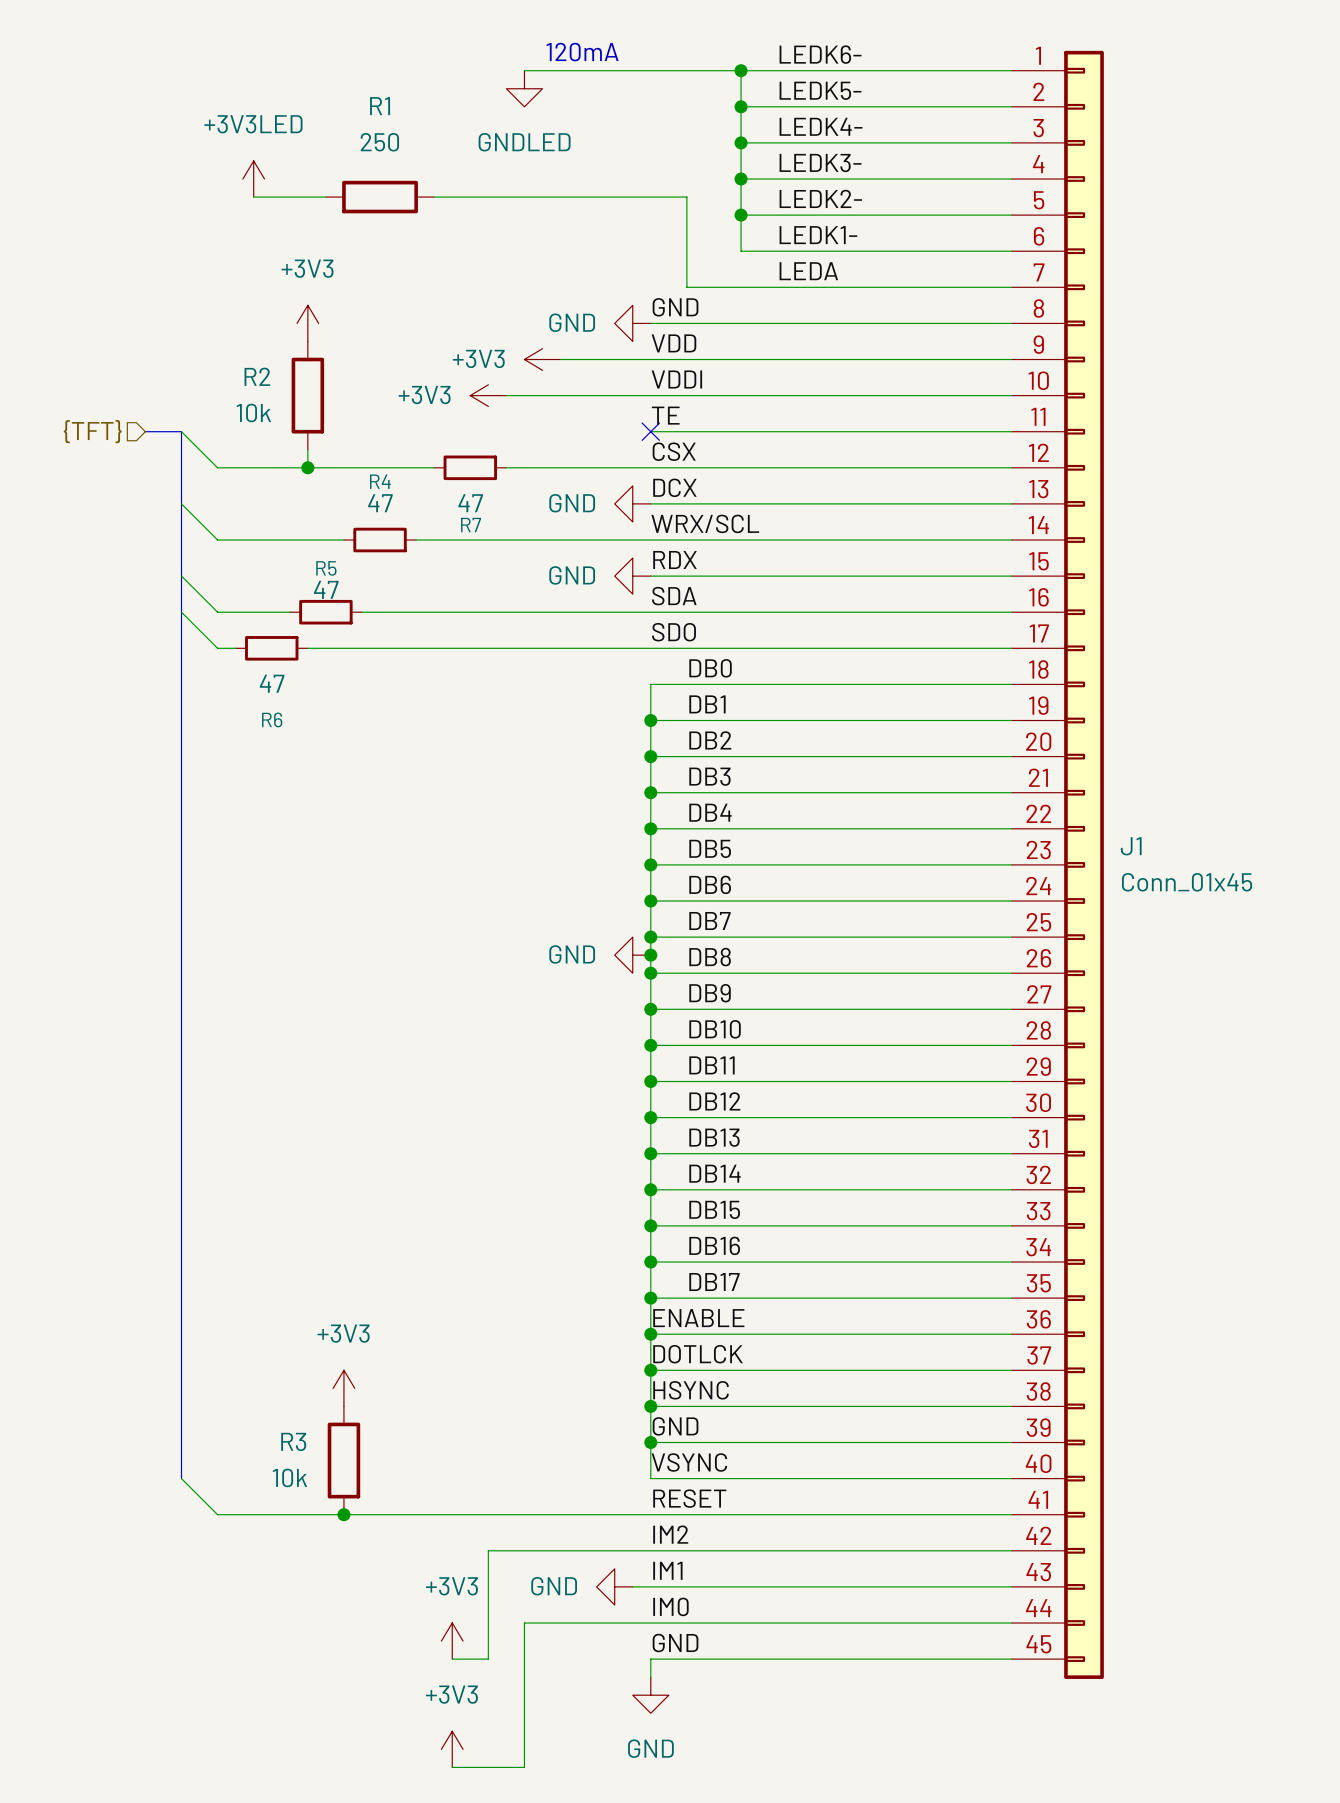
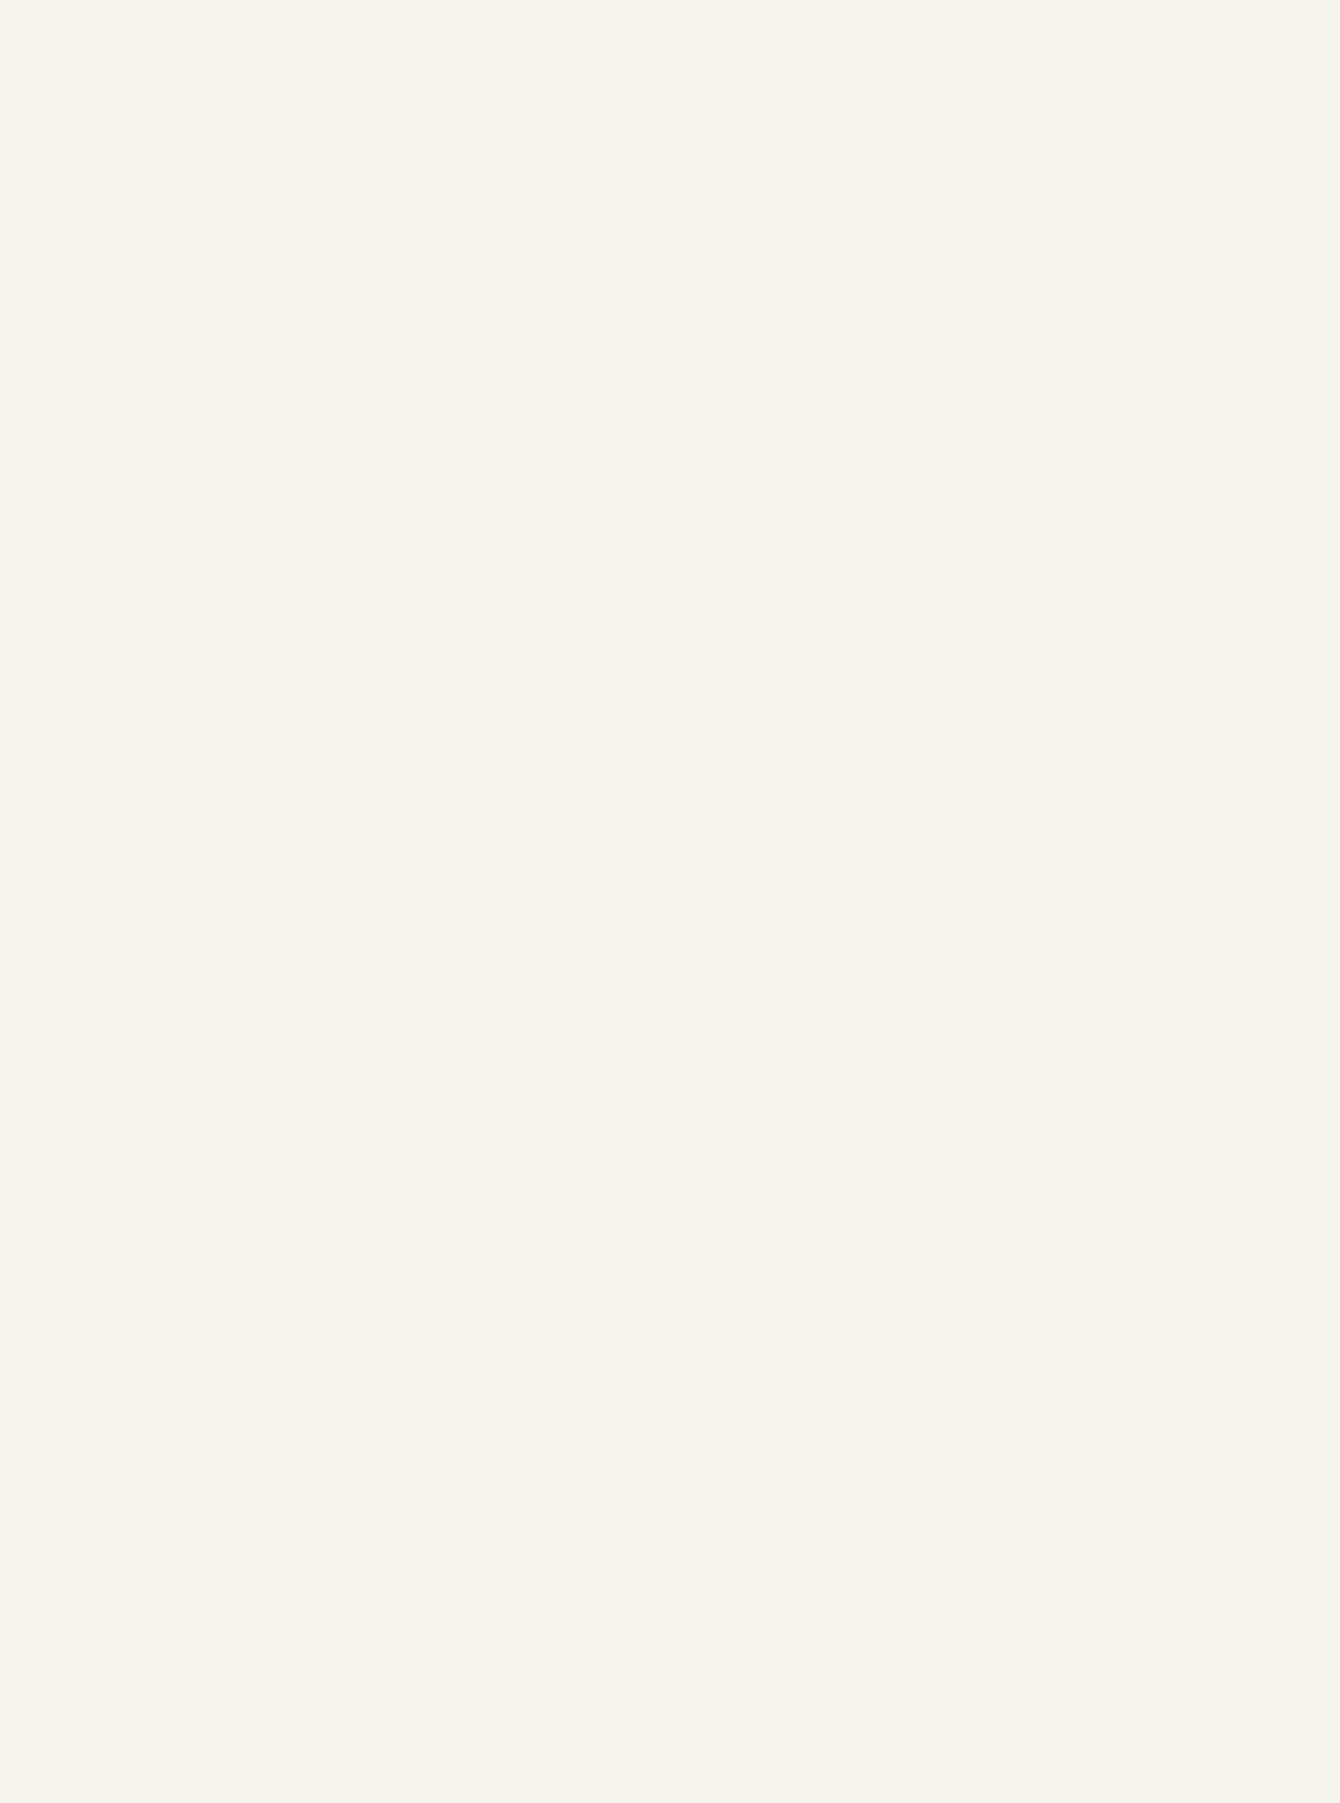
text: 120mA (582, 52) -> none
label: LEDK6- (820, 54) -> none
wire: (524, 70) (1011, 70) -> none
wire: (741, 70) (741, 251) (1011, 251) -> none
junction: (741, 70) -> none
power symbol: GNDLED (524, 88) -> none
label: LEDK5- (820, 90) -> none
wire: (741, 106) (1011, 106) -> none
junction: (741, 106) -> none
label: LEDK4- (821, 126) -> none
wire: (741, 142) (1011, 142) -> none
junction: (741, 142) -> none
label: LEDK3- (820, 163) -> none
power symbol: +3V3LED (253, 179) -> none
wire: (741, 179) (1011, 179) -> none
junction: (741, 179) -> none
wire: (253, 197) (325, 197) -> none
R1: 250 (380, 197) -> none
wire: (434, 197) (686, 197) (686, 287) (1011, 287) -> none
label: LEDK2- (820, 198) -> none
wire: (741, 215) (1011, 215) -> none
junction: (741, 215) -> none
label: LEDK1- (818, 235) -> none
label: LEDA (808, 271) -> none
label: GND (675, 307) -> none
power symbol: +3V3 (307, 323) -> none
power symbol: GND (632, 323) -> none
wire: (650, 323) (1011, 323) -> none
label: VDD (673, 343) -> none
power symbol: +3V3 (542, 359) -> none
wire: (560, 359) (1011, 359) -> none
label: VDDI (676, 379) -> none
R2: 10k (307, 395) -> none
power symbol: +3V3 (488, 395) -> none
wire: (506, 395) (1011, 395) -> none
label: TE (665, 415) -> none
hierarchical label: {TFT} (92, 431) -> none
bus: (145, 431) (181, 431) (181, 1478) -> none
wire: (181, 431) (217, 467) (434, 467) -> none
wire: (650, 431) (1011, 431) -> none
no-connect mark: (650, 431) -> none
wire: (307, 449) (307, 467) -> none
label: CSX (674, 451) -> none
junction: (307, 467) -> none
R7: 47 (470, 467) -> none
wire: (506, 467) (1011, 467) -> none
label: DCX (674, 487) -> none
wire: (181, 503) (217, 540) (343, 540) -> none
power symbol: GND (632, 503) -> none
wire: (650, 503) (1011, 503) -> none
label: WRX/SCL (705, 523) -> none
R4: 47 (380, 540) -> none
wire: (416, 540) (1011, 540) -> none
label: RDX (674, 560) -> none
wire: (181, 576) (217, 612) (289, 612) -> none
power symbol: GND (632, 576) -> none
wire: (650, 576) (1011, 576) -> none
label: SDA (674, 596) -> none
wire: (181, 612) (217, 648) (235, 648) -> none
R5: 47 (325, 612) -> none
wire: (362, 612) (1011, 612) -> none
label: SDO (674, 632) -> none
R6: 47 (271, 648) -> none
wire: (307, 648) (1011, 648) -> none
label: DB0 (710, 668) -> none
wire: (1011, 684) (650, 684) (650, 1478) (1011, 1478) -> none
label: DB1 (707, 704) -> none
wire: (650, 720) (1011, 720) -> none
junction: (650, 720) -> none
label: DB2 (710, 740) -> none
wire: (650, 756) (1011, 756) -> none
junction: (650, 756) -> none
label: DB3 (709, 776) -> none
wire: (650, 792) (1011, 792) -> none
junction: (650, 792) -> none
label: DB4 (710, 812) -> none
wire: (650, 828) (1011, 828) -> none
junction: (650, 828) -> none
label: DB5 (710, 848) -> none
wire: (650, 864) (1011, 864) -> none
junction: (650, 864) -> none
J1: Conn_01x45 (1057, 864) -> none
label: DB6 (710, 884) -> none
wire: (650, 901) (1011, 901) -> none
junction: (650, 901) -> none
label: DB7 (709, 921) -> none
wire: (650, 937) (1011, 937) -> none
junction: (650, 937) -> none
power symbol: GND (632, 955) -> none
junction: (650, 955) -> none
label: DB8 (710, 957) -> none
wire: (650, 973) (1011, 973) -> none
junction: (650, 973) -> none
label: DB9 (710, 993) -> none
wire: (650, 1009) (1011, 1009) -> none
junction: (650, 1009) -> none
label: DB10 (715, 1029) -> none
wire: (650, 1045) (1011, 1045) -> none
junction: (650, 1045) -> none
label: DB11 (711, 1065) -> none
wire: (650, 1081) (1011, 1081) -> none
junction: (650, 1081) -> none
label: DB12 (714, 1101) -> none
wire: (650, 1117) (1011, 1117) -> none
junction: (650, 1117) -> none
label: DB13 (714, 1137) -> none
wire: (650, 1153) (1011, 1153) -> none
junction: (650, 1153) -> none
label: DB14 (715, 1173) -> none
wire: (650, 1189) (1011, 1189) -> none
junction: (650, 1189) -> none
label: DB15 (714, 1209) -> none
wire: (650, 1225) (1011, 1225) -> none
junction: (650, 1225) -> none
label: DB16 (714, 1245) -> none
wire: (650, 1262) (1011, 1262) -> none
junction: (650, 1262) -> none
label: DB17 (714, 1282) -> none
wire: (650, 1298) (1011, 1298) -> none
junction: (650, 1298) -> none
label: ENABLE (698, 1318) -> none
wire: (650, 1334) (1011, 1334) -> none
junction: (650, 1334) -> none
label: DOTLCK (698, 1354) -> none
wire: (650, 1370) (1011, 1370) -> none
junction: (650, 1370) -> none
power symbol: +3V3 (343, 1388) -> none
label: HSYNC (690, 1390) -> none
wire: (650, 1406) (1011, 1406) -> none
junction: (650, 1406) -> none
label: GND (675, 1426) -> none
wire: (650, 1442) (1011, 1442) -> none
junction: (650, 1442) -> none
R3: 10k (343, 1460) -> none
label: VSYNC (689, 1462) -> none
wire: (181, 1478) (217, 1514) (1011, 1514) -> none
label: RESET (689, 1498) -> none
junction: (343, 1514) -> none
label: IM2 (670, 1534) -> none
wire: (1011, 1550) (488, 1550) (488, 1659) (452, 1659) -> none
label: IM1 (667, 1570) -> none
power symbol: GND (614, 1586) -> none
wire: (632, 1586) (1011, 1586) -> none
label: IM0 (670, 1606) -> none
wire: (1011, 1623) (524, 1623) (524, 1767) (452, 1767) -> none
power symbol: +3V3 (452, 1641) -> none
label: GND (675, 1643) -> none
wire: (1011, 1659) (650, 1659) (650, 1677) -> none
power symbol: GND (650, 1695) -> none
power symbol: +3V3 (452, 1749) -> none

